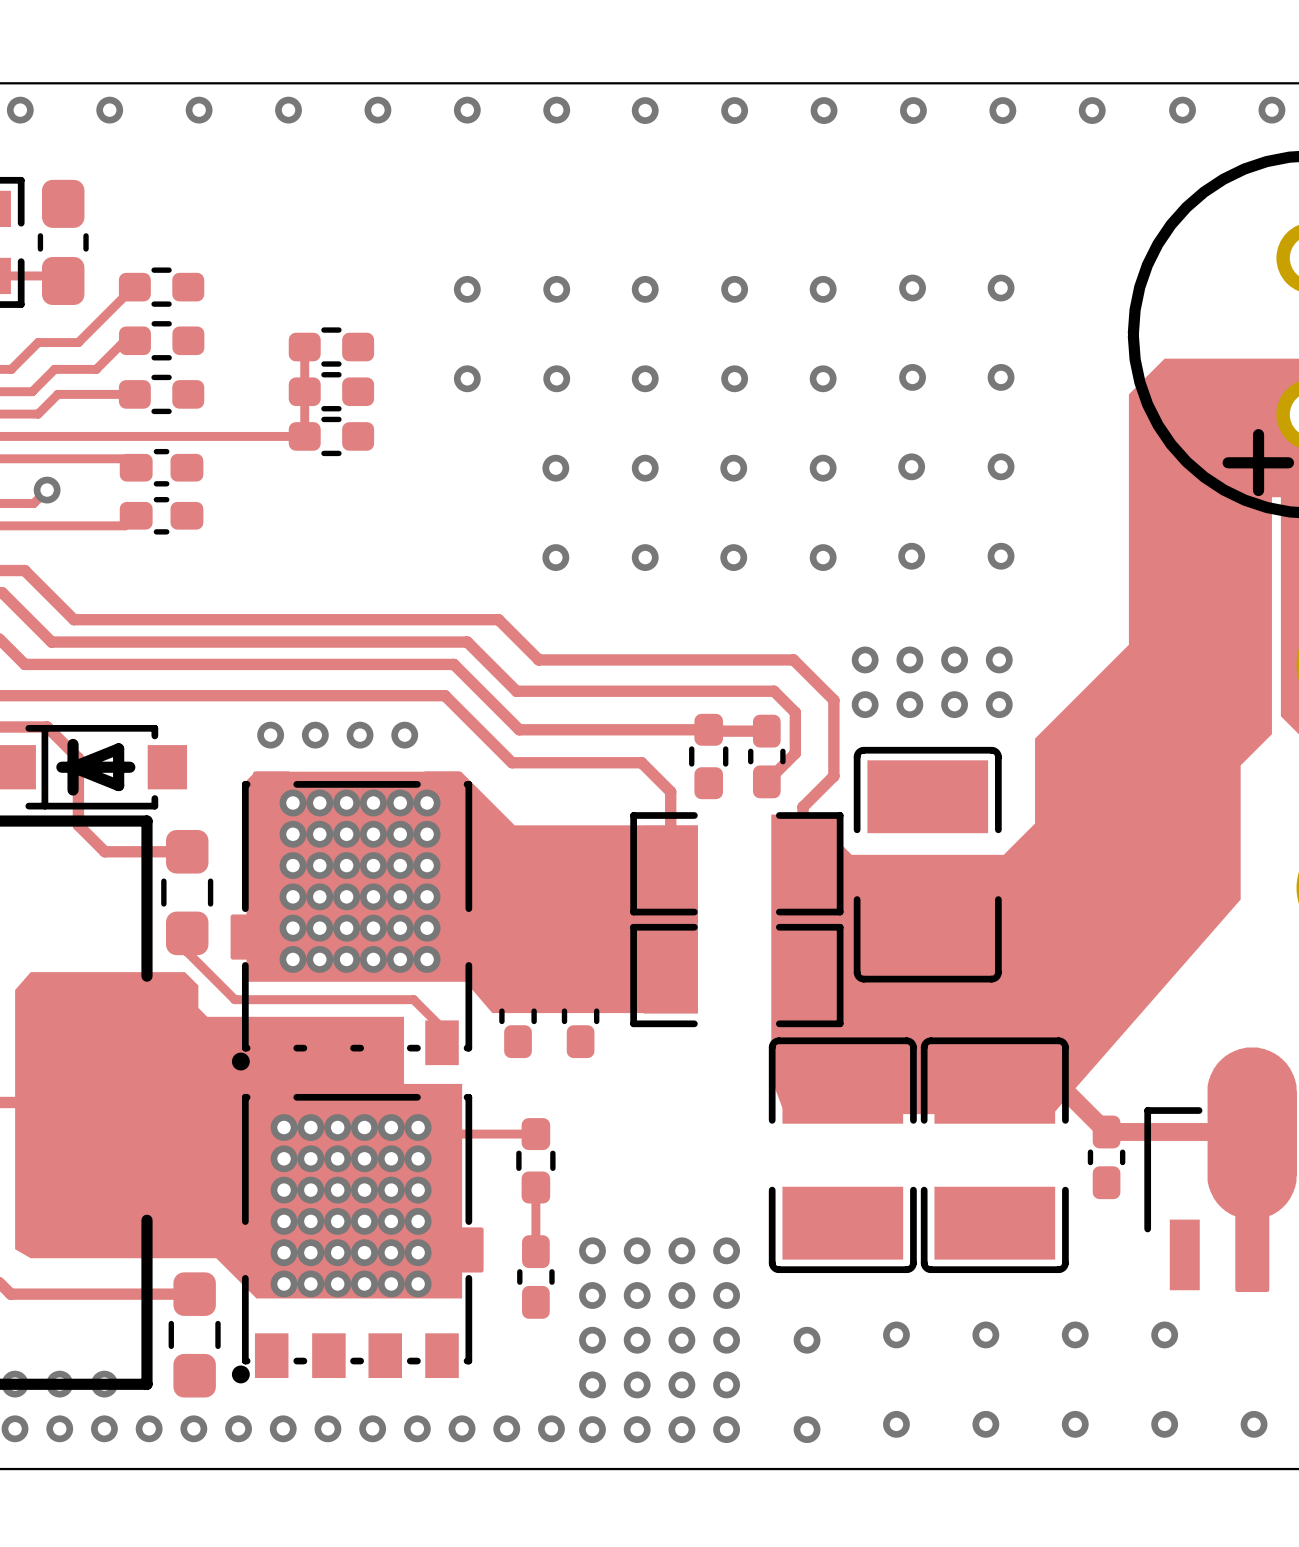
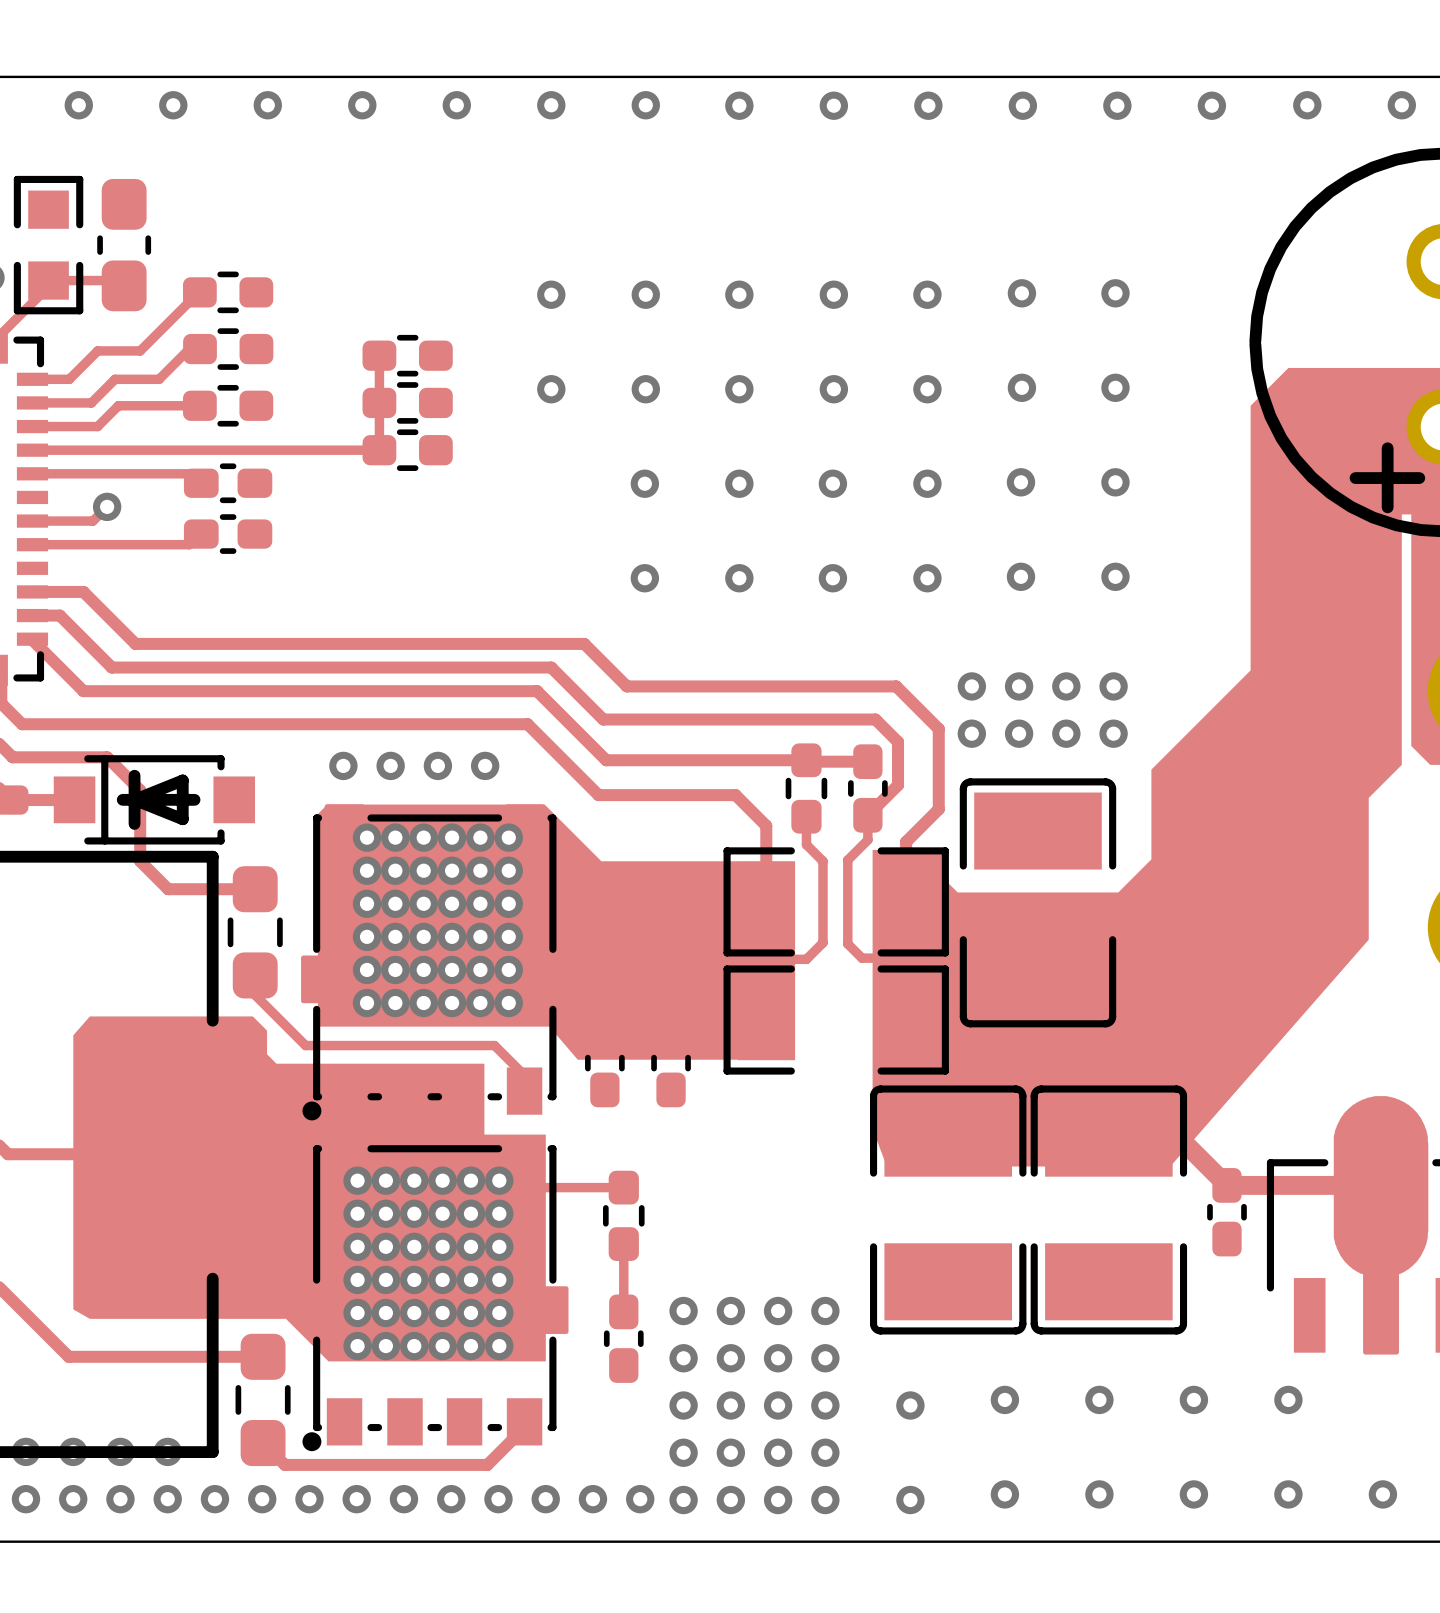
track: none -> (867, 815) (867, 840) (847, 860) (847, 943) (861, 958) (1034, 958) (1037, 961) (1037, 974)
track: none -> (806, 816) (806, 844) (822, 861) (822, 942) (806, 959) (583, 959)
track: none -> (524, 1421) (524, 1427) (487, 1464) (284, 1464) (263, 1443)

